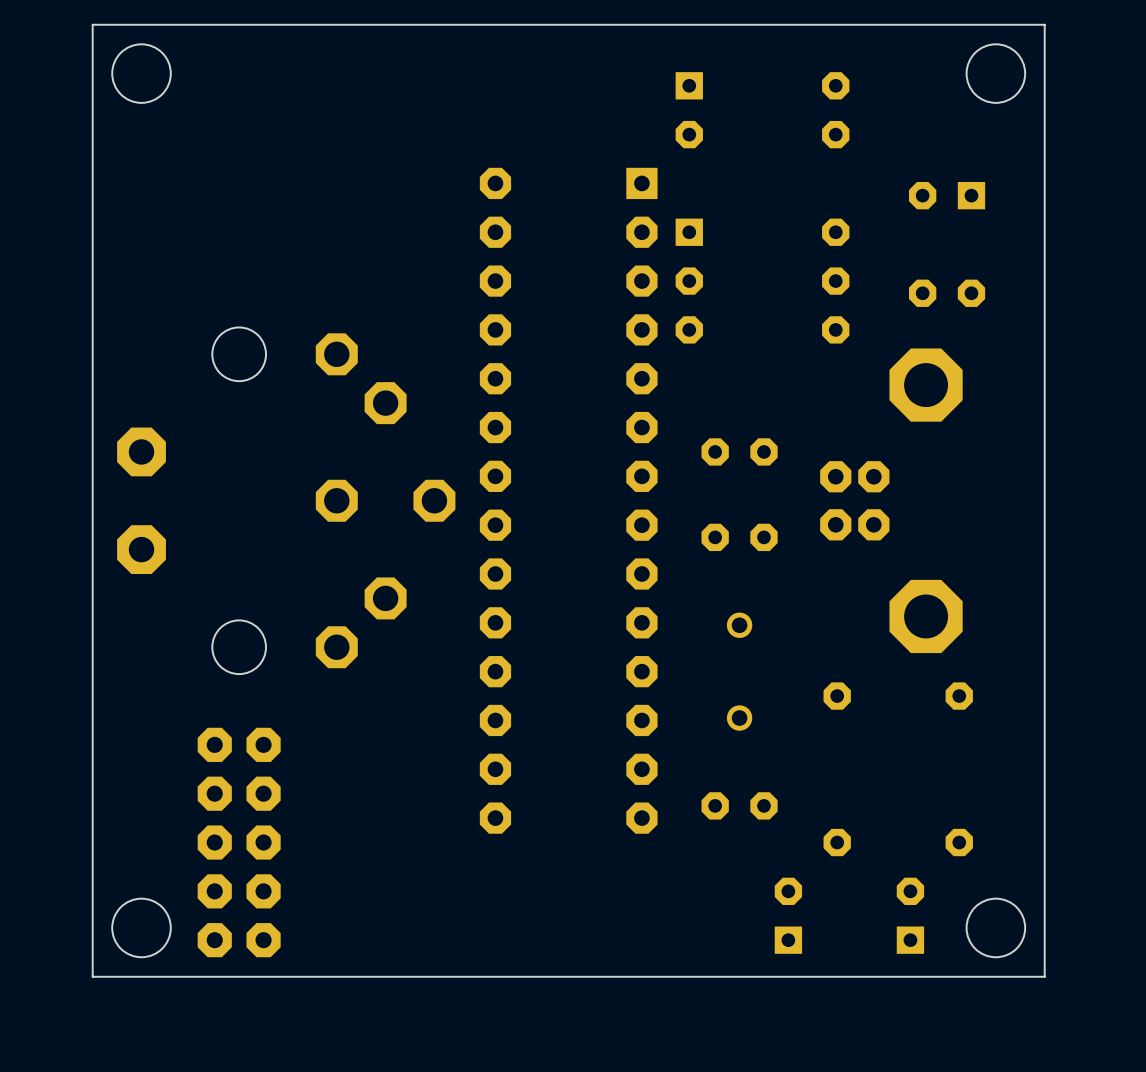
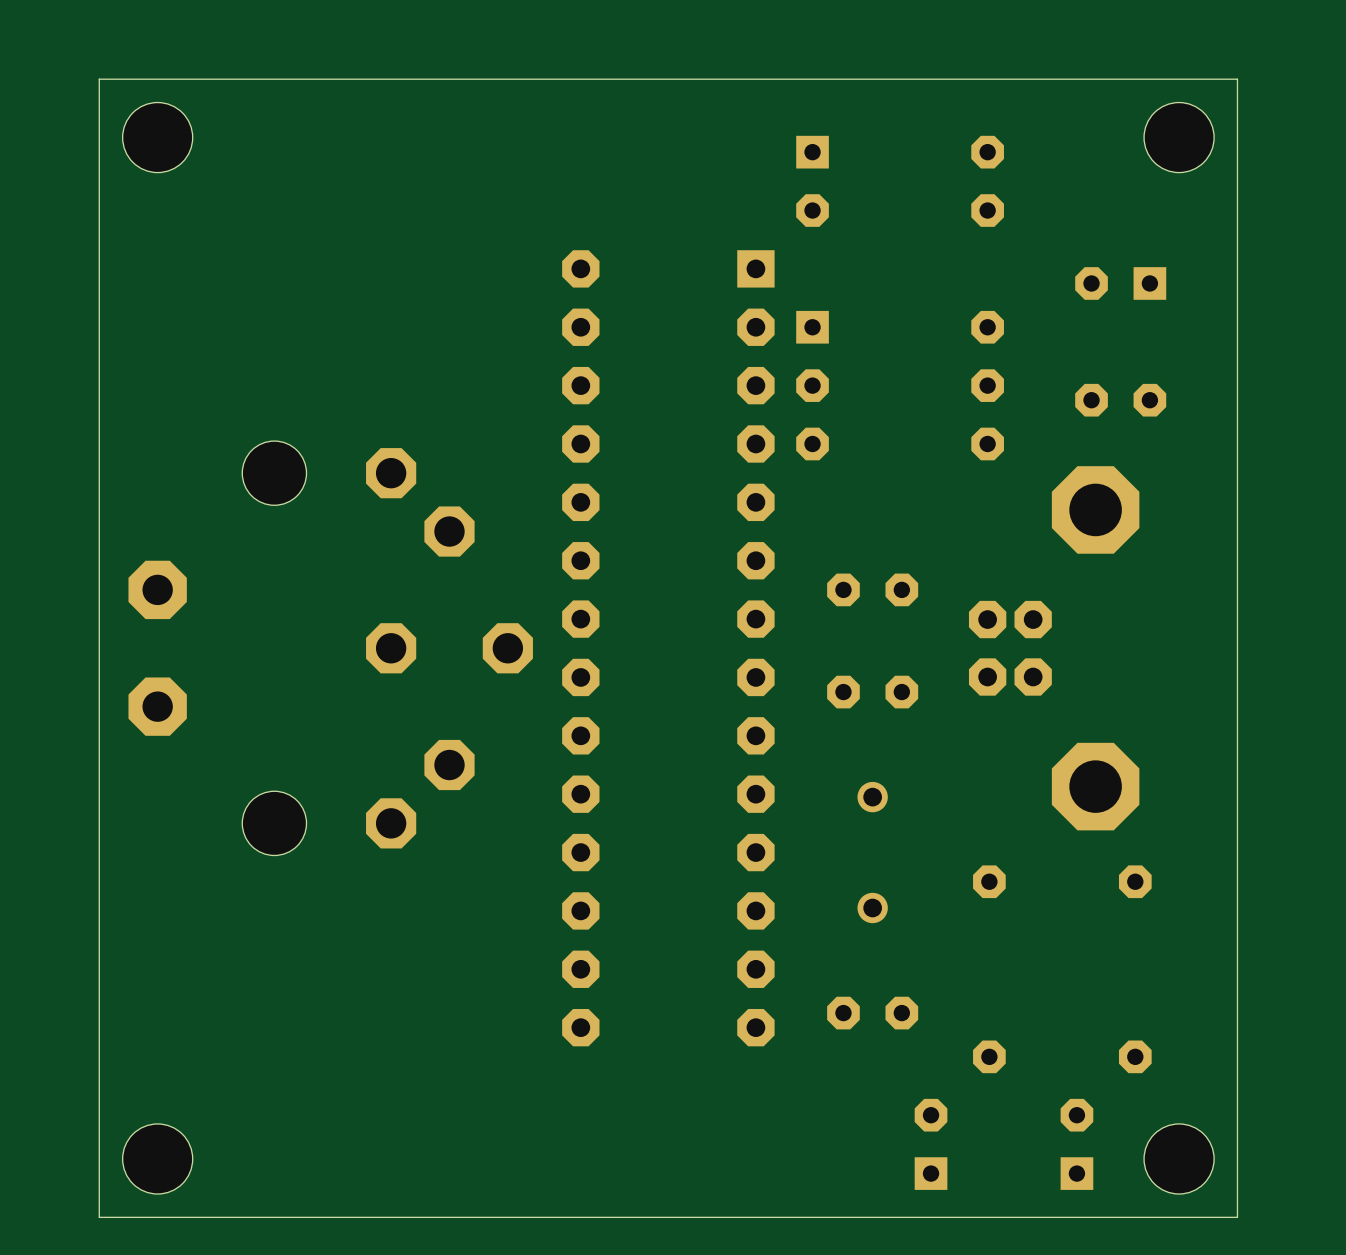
part: (239, 842) -> none

